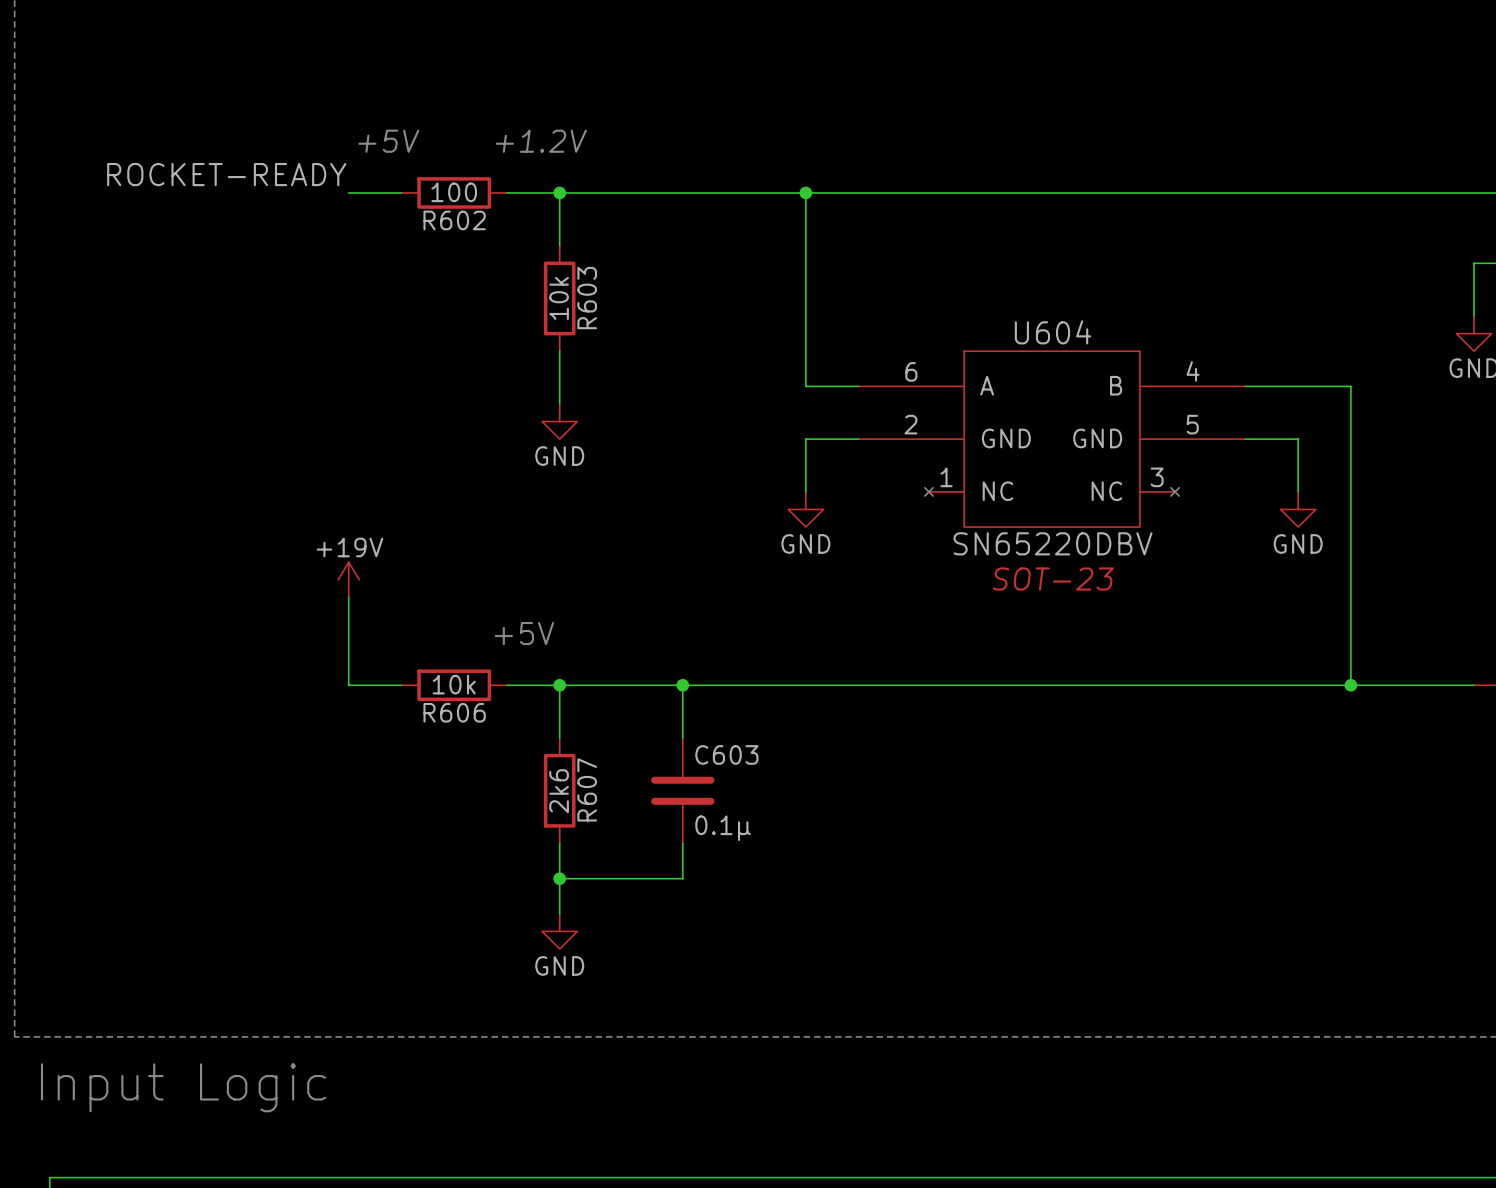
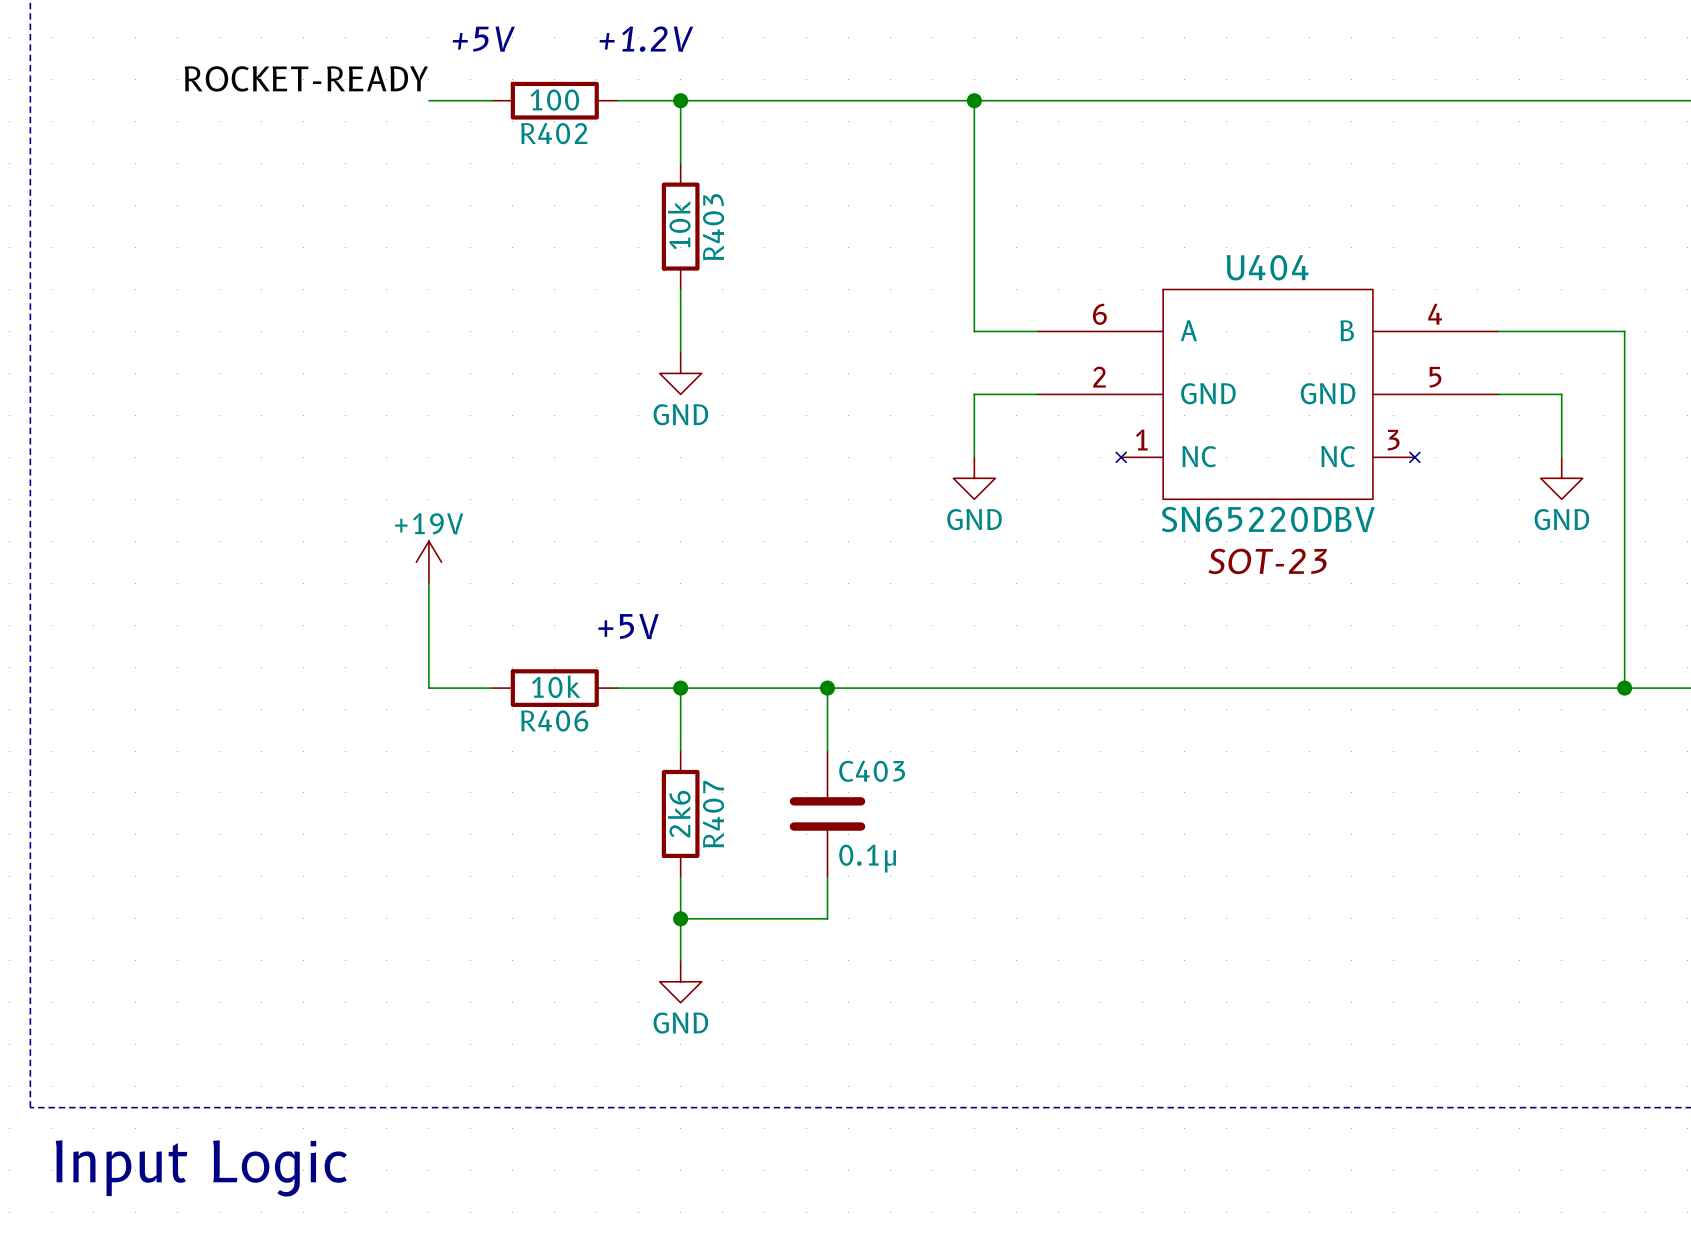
R602 name: R602 (454, 220) -> R402 (554, 133)
R603 name: R603 (587, 298) -> R403 (713, 227)
U604 name: U604 (1053, 332) -> U404 (1267, 267)
R606 name: R606 (454, 712) -> R406 (554, 720)
C603 name: C603 (726, 754) -> C403 (872, 771)
R607 name: R607 (587, 789) -> R407 (713, 814)

